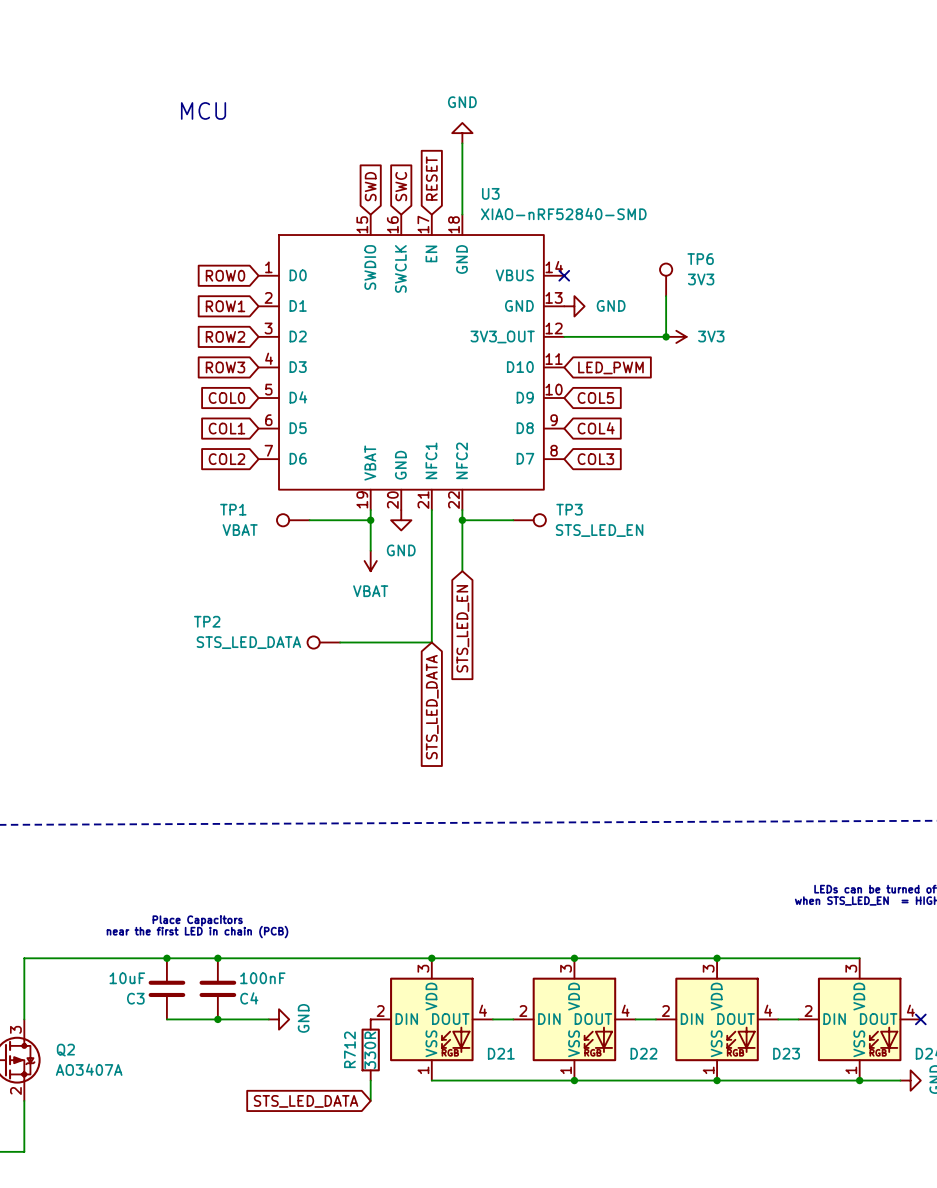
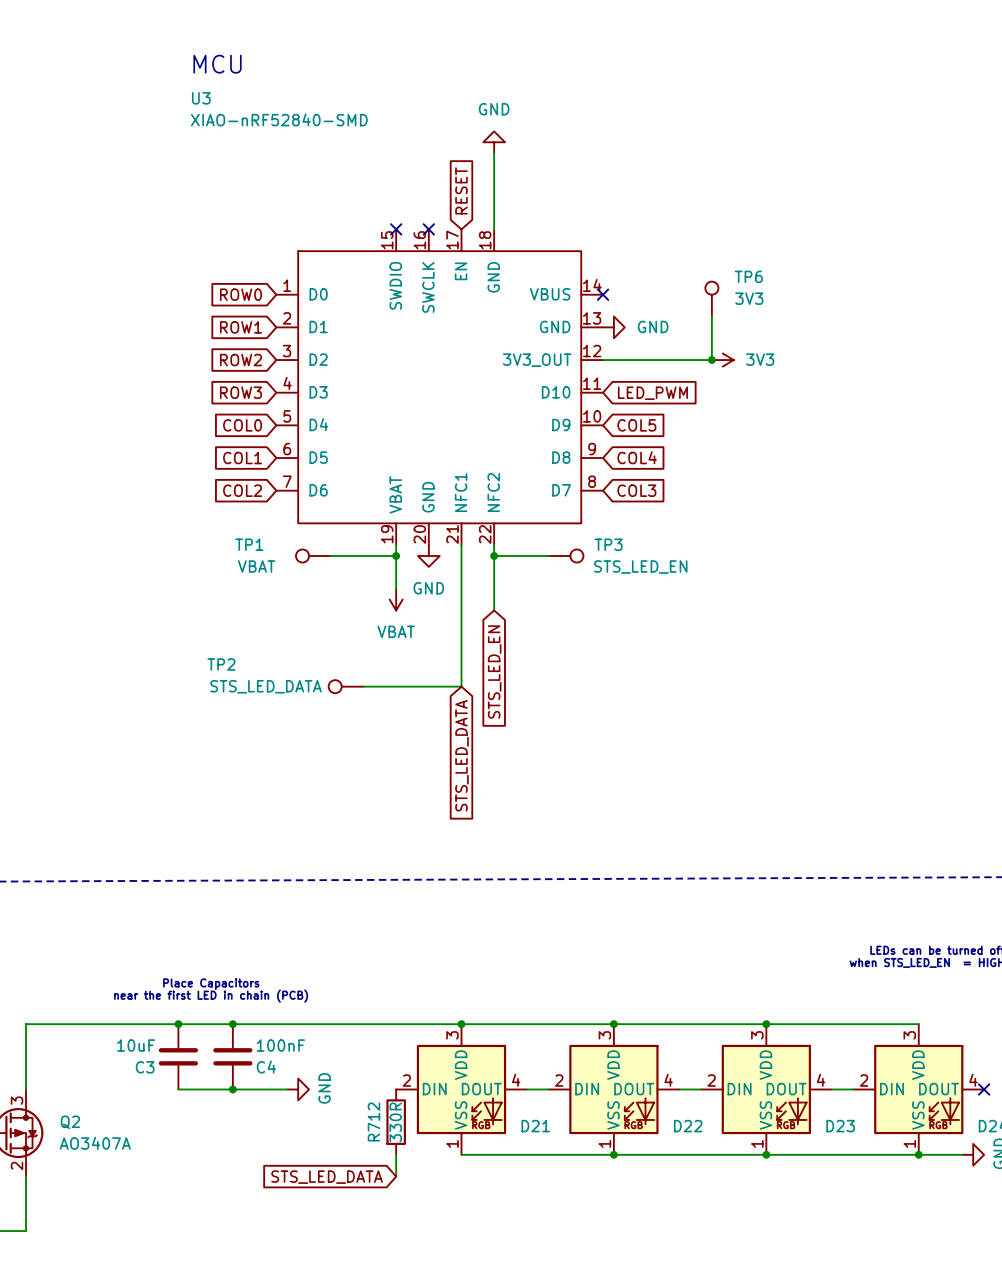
text position: MCU (203, 110) -> MCU (217, 64)
global label: SWD (370, 186) -> none
global label: SWC (401, 186) -> none
U3 name position: U3 (490, 193) -> U3 (201, 98)
no-connect mark: none -> (396, 229)
no-connect mark: none -> (428, 229)
U3 value position: XIAO-nRF52840-SMD (563, 214) -> XIAO-nRF52840-SMD (279, 119)

